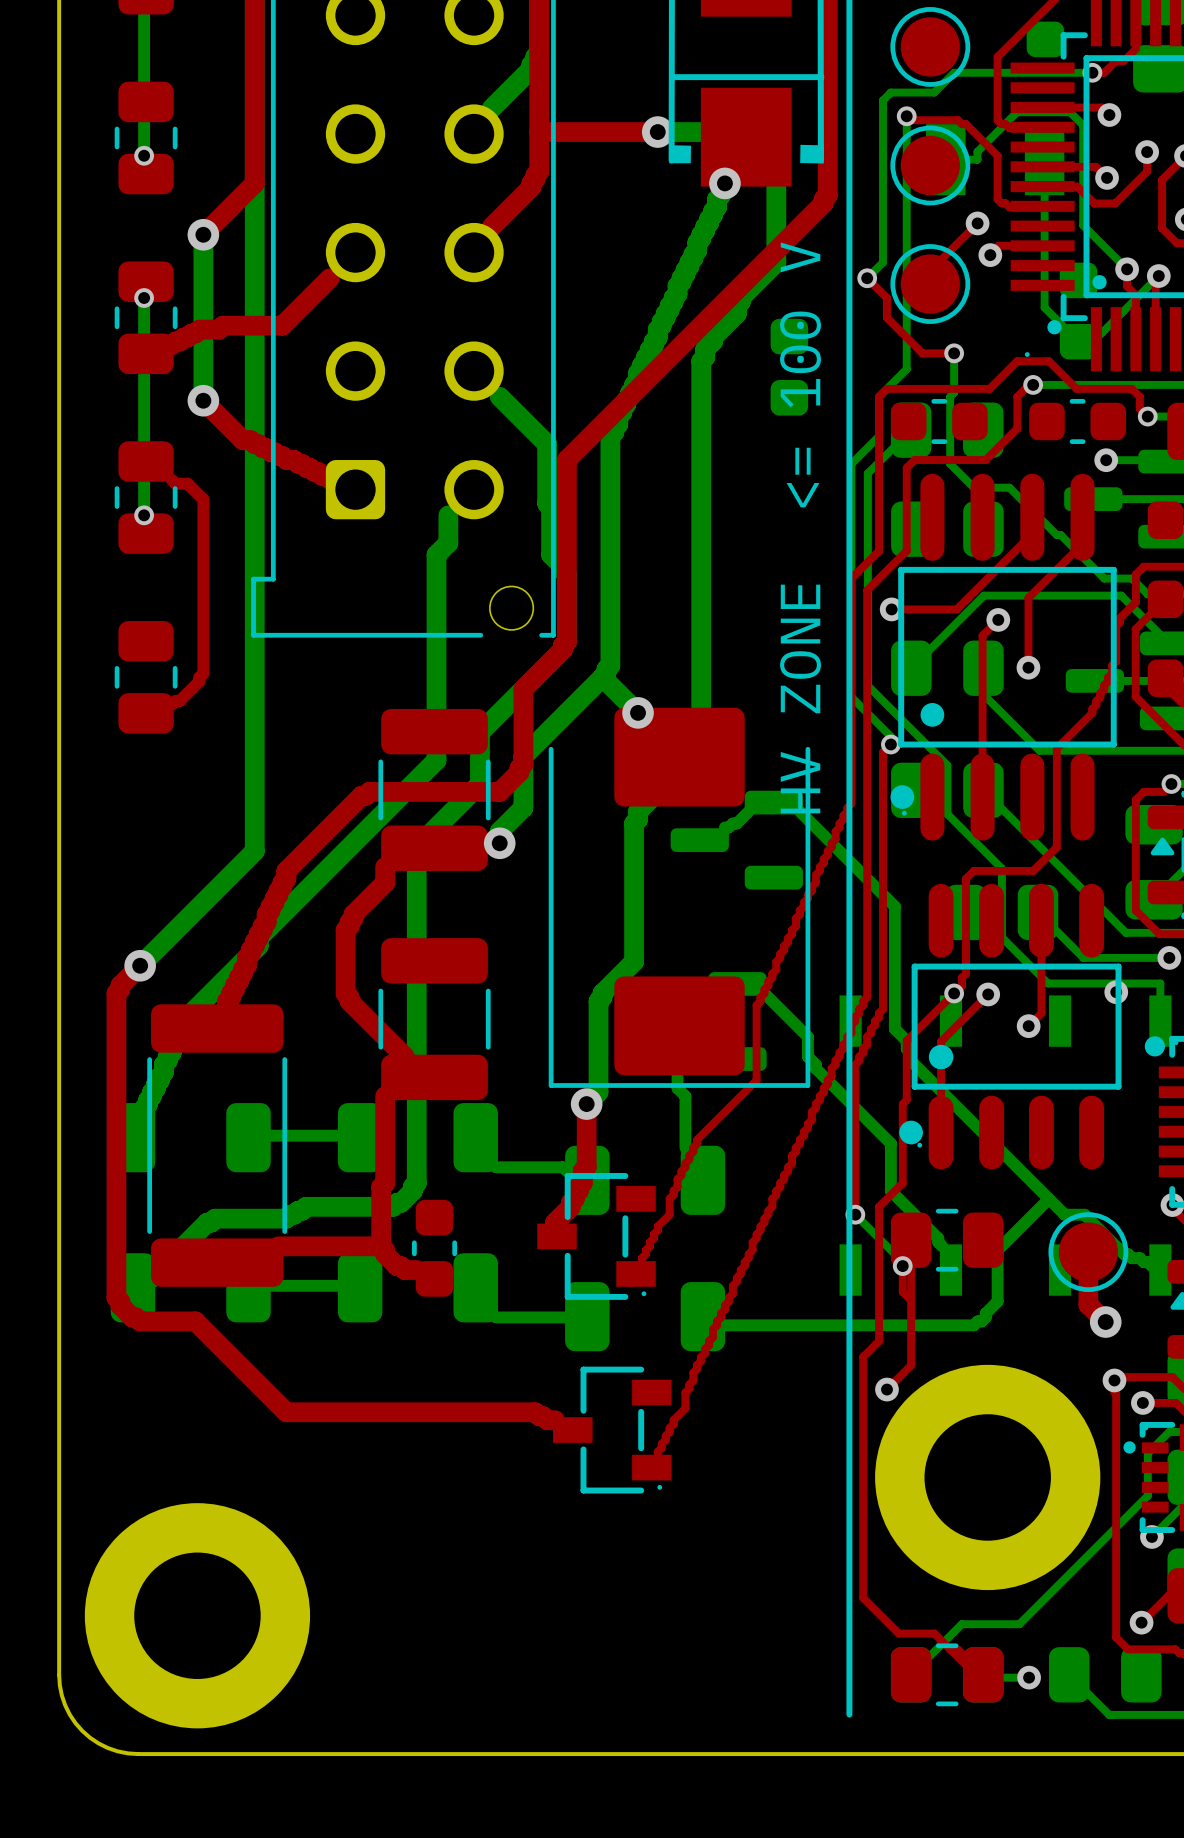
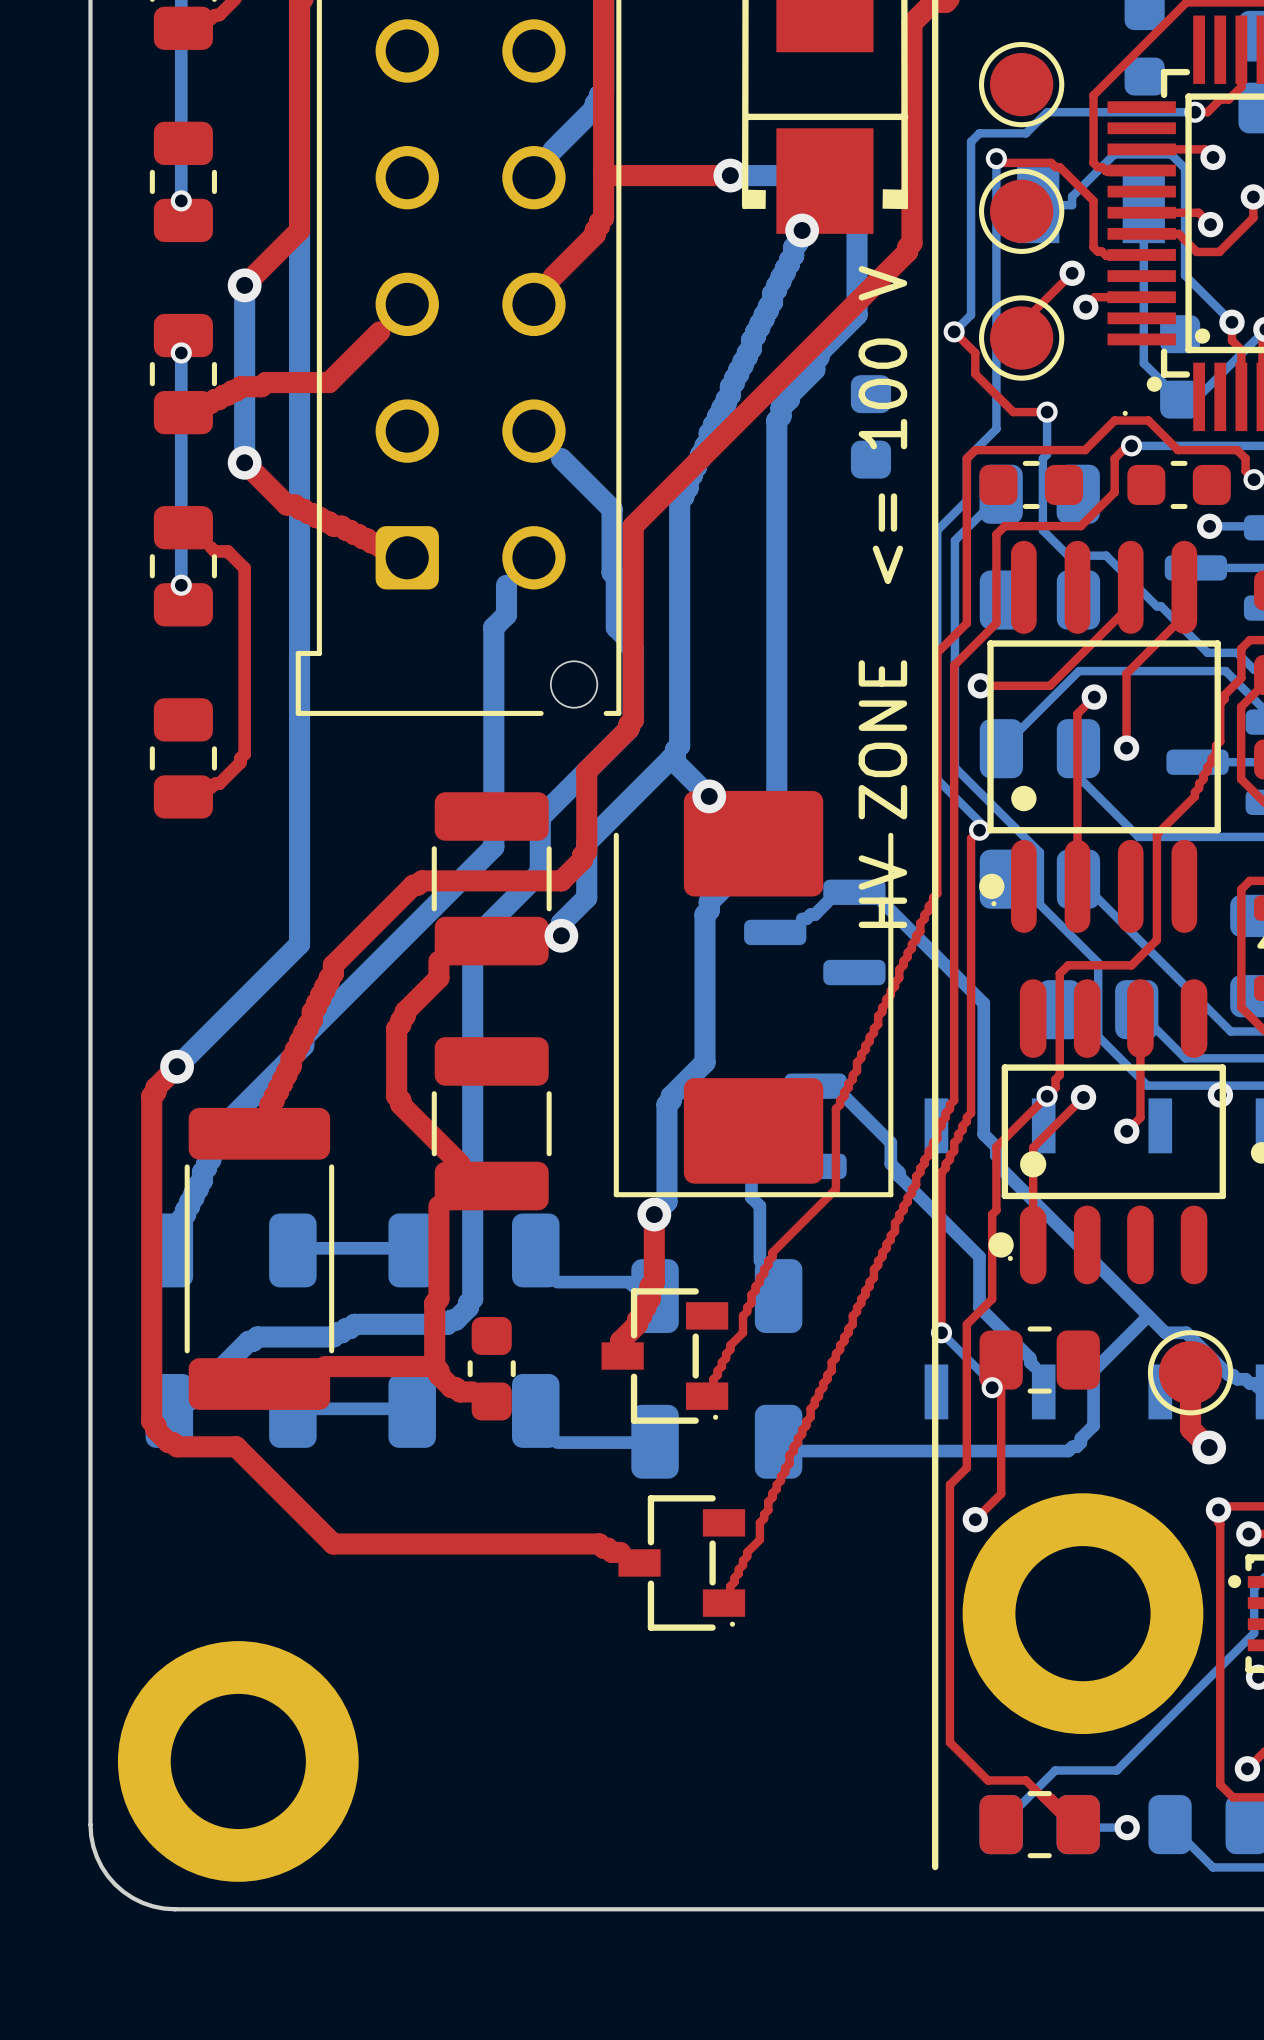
top track: (902, 1266) (902, 1292) (911, 1300) -> none

